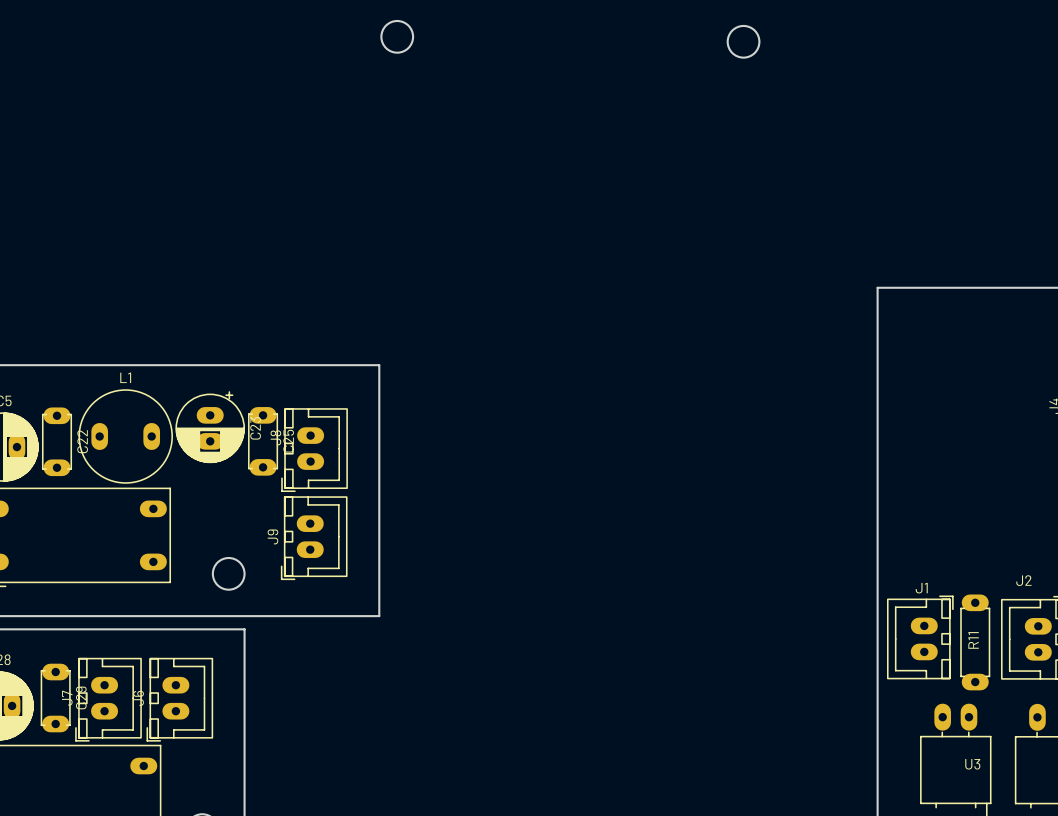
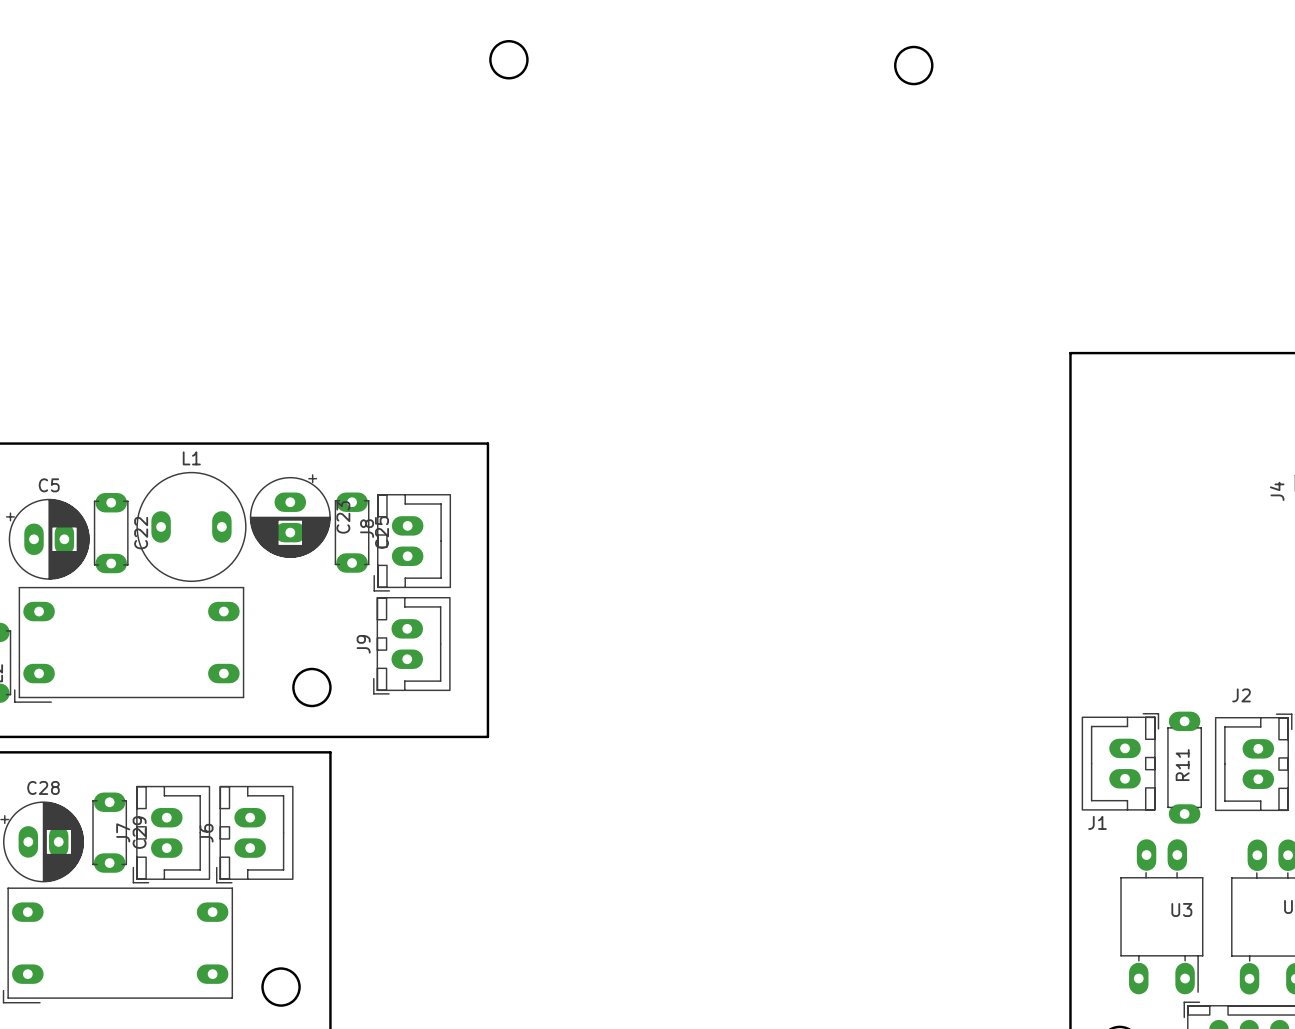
J1 name position: J1 (921, 588) -> J1 (1097, 822)

